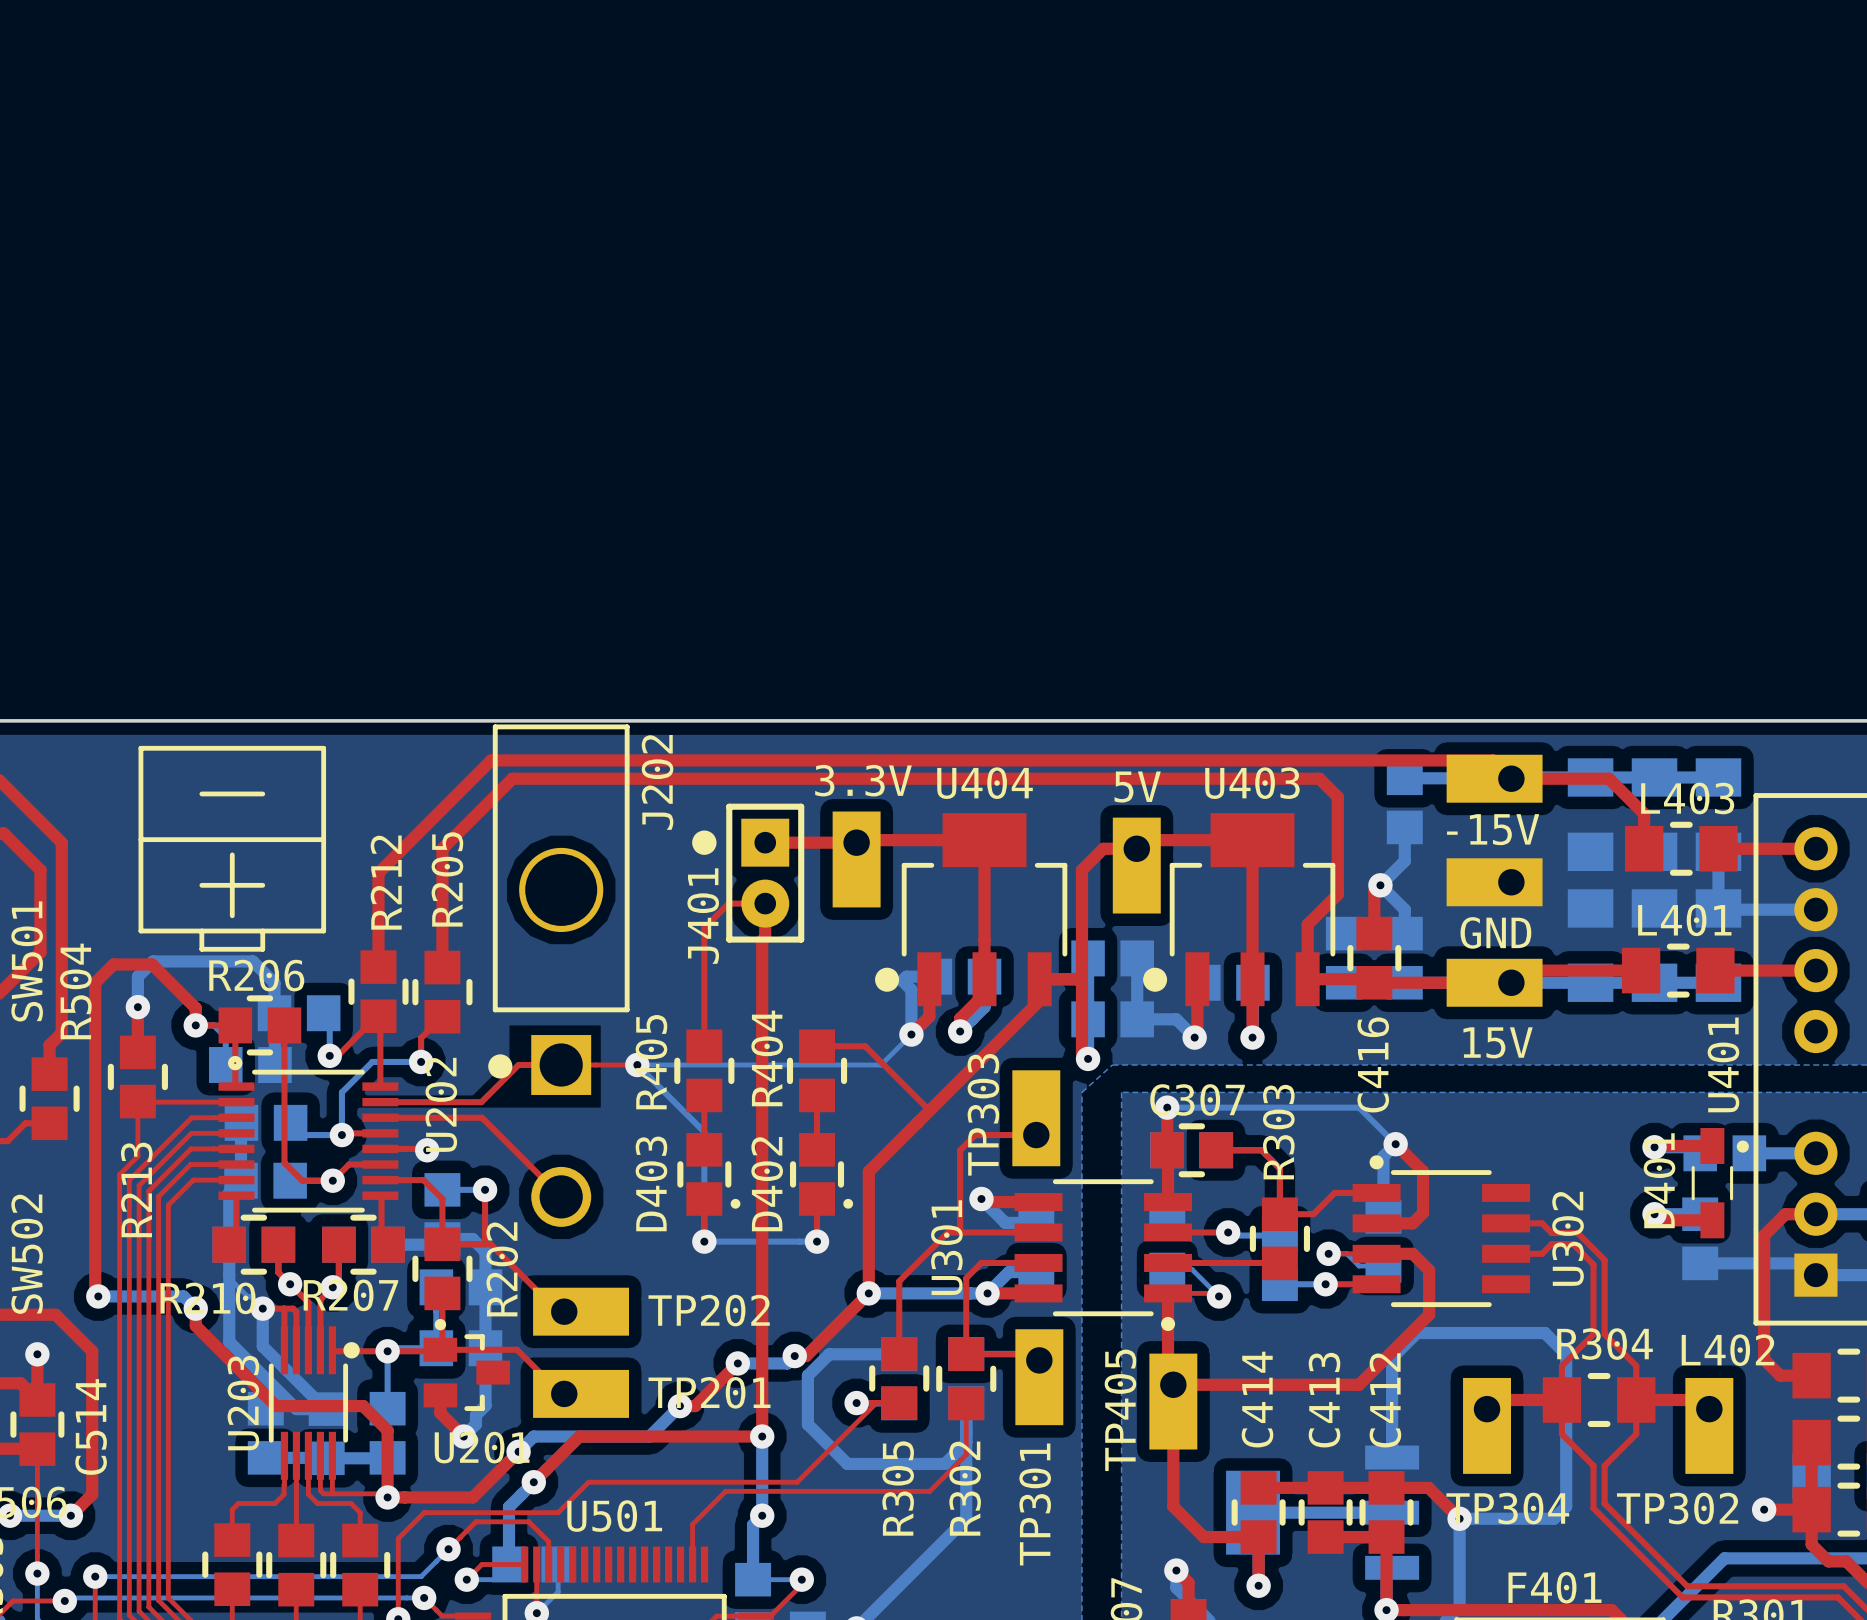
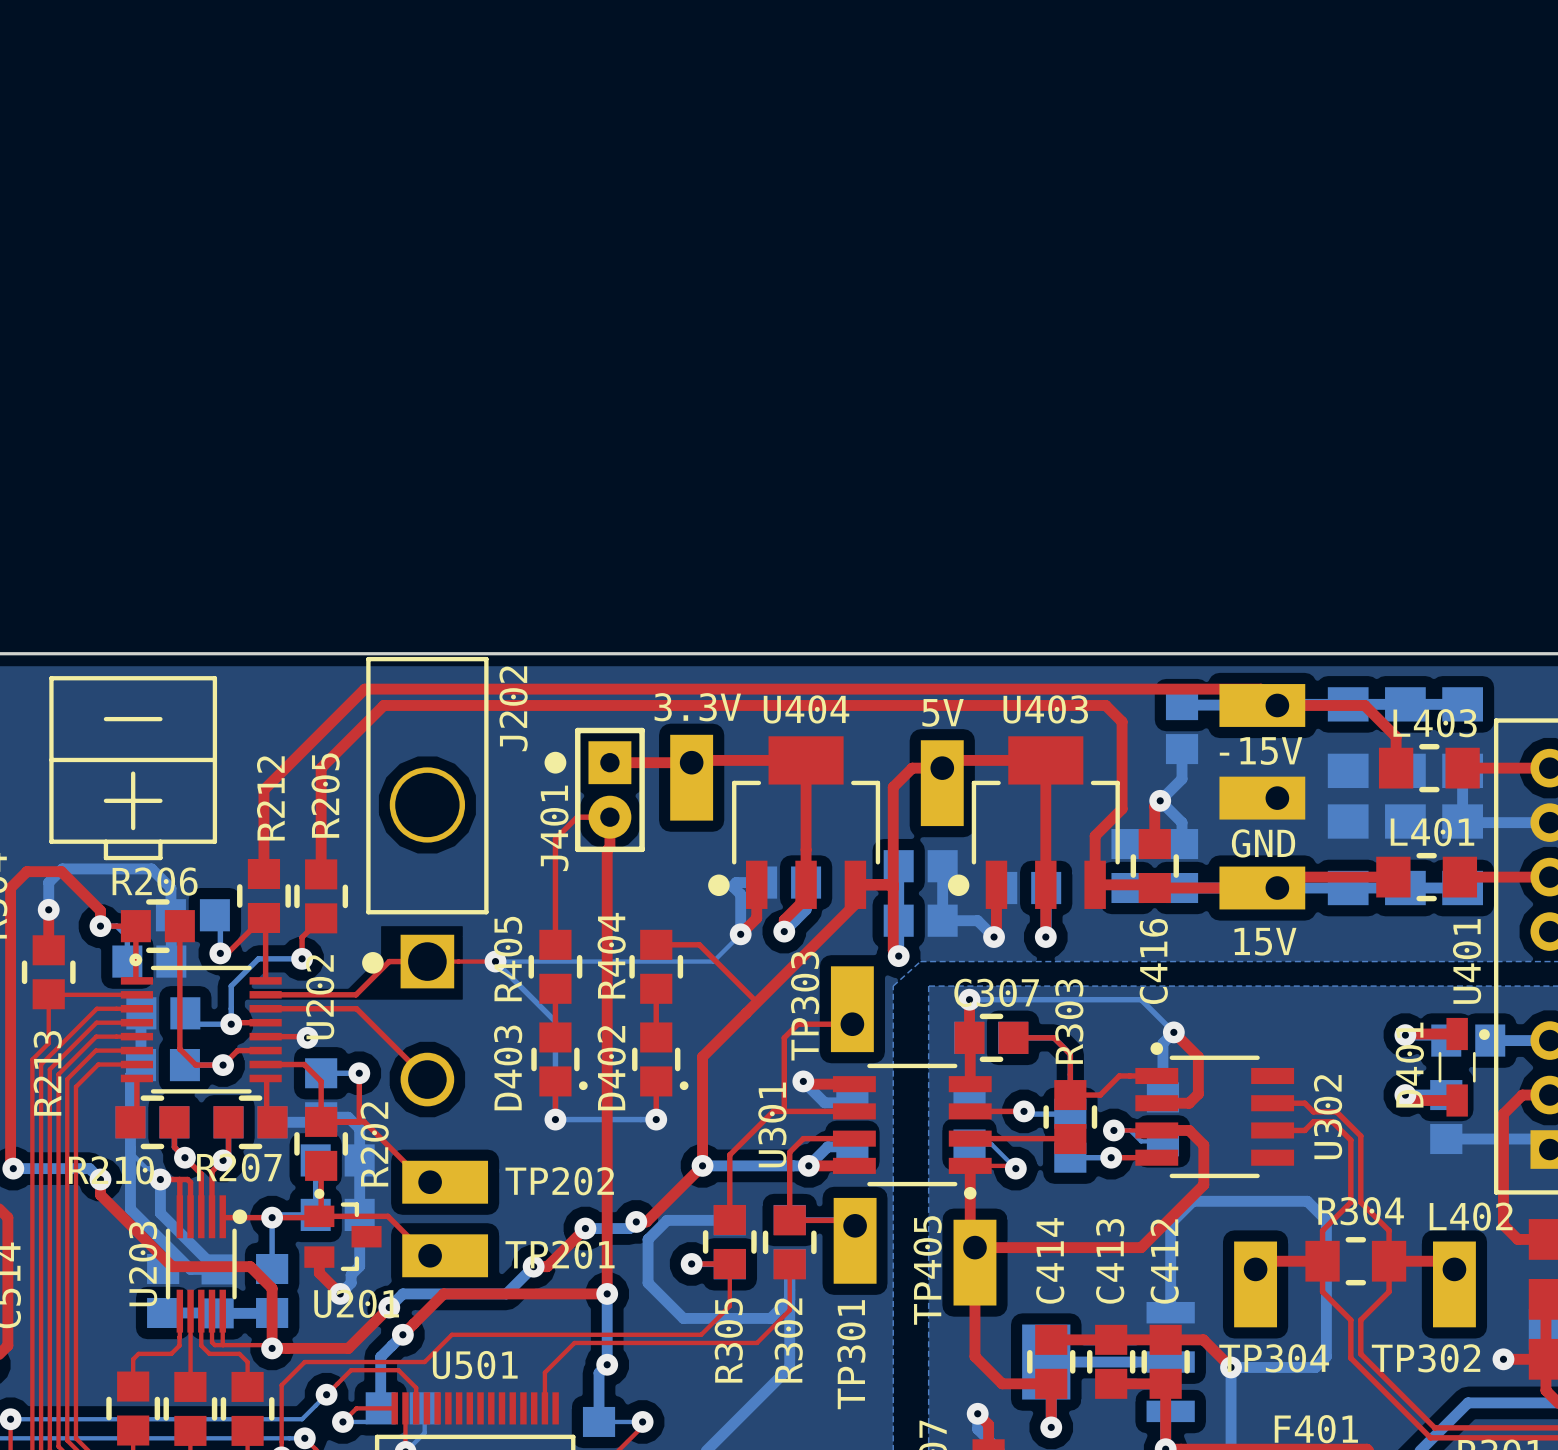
top track: (899, 1403) (876, 1403) (797, 1482) -> (729, 1263) (729, 1306) (701, 1334) (638, 1334)

